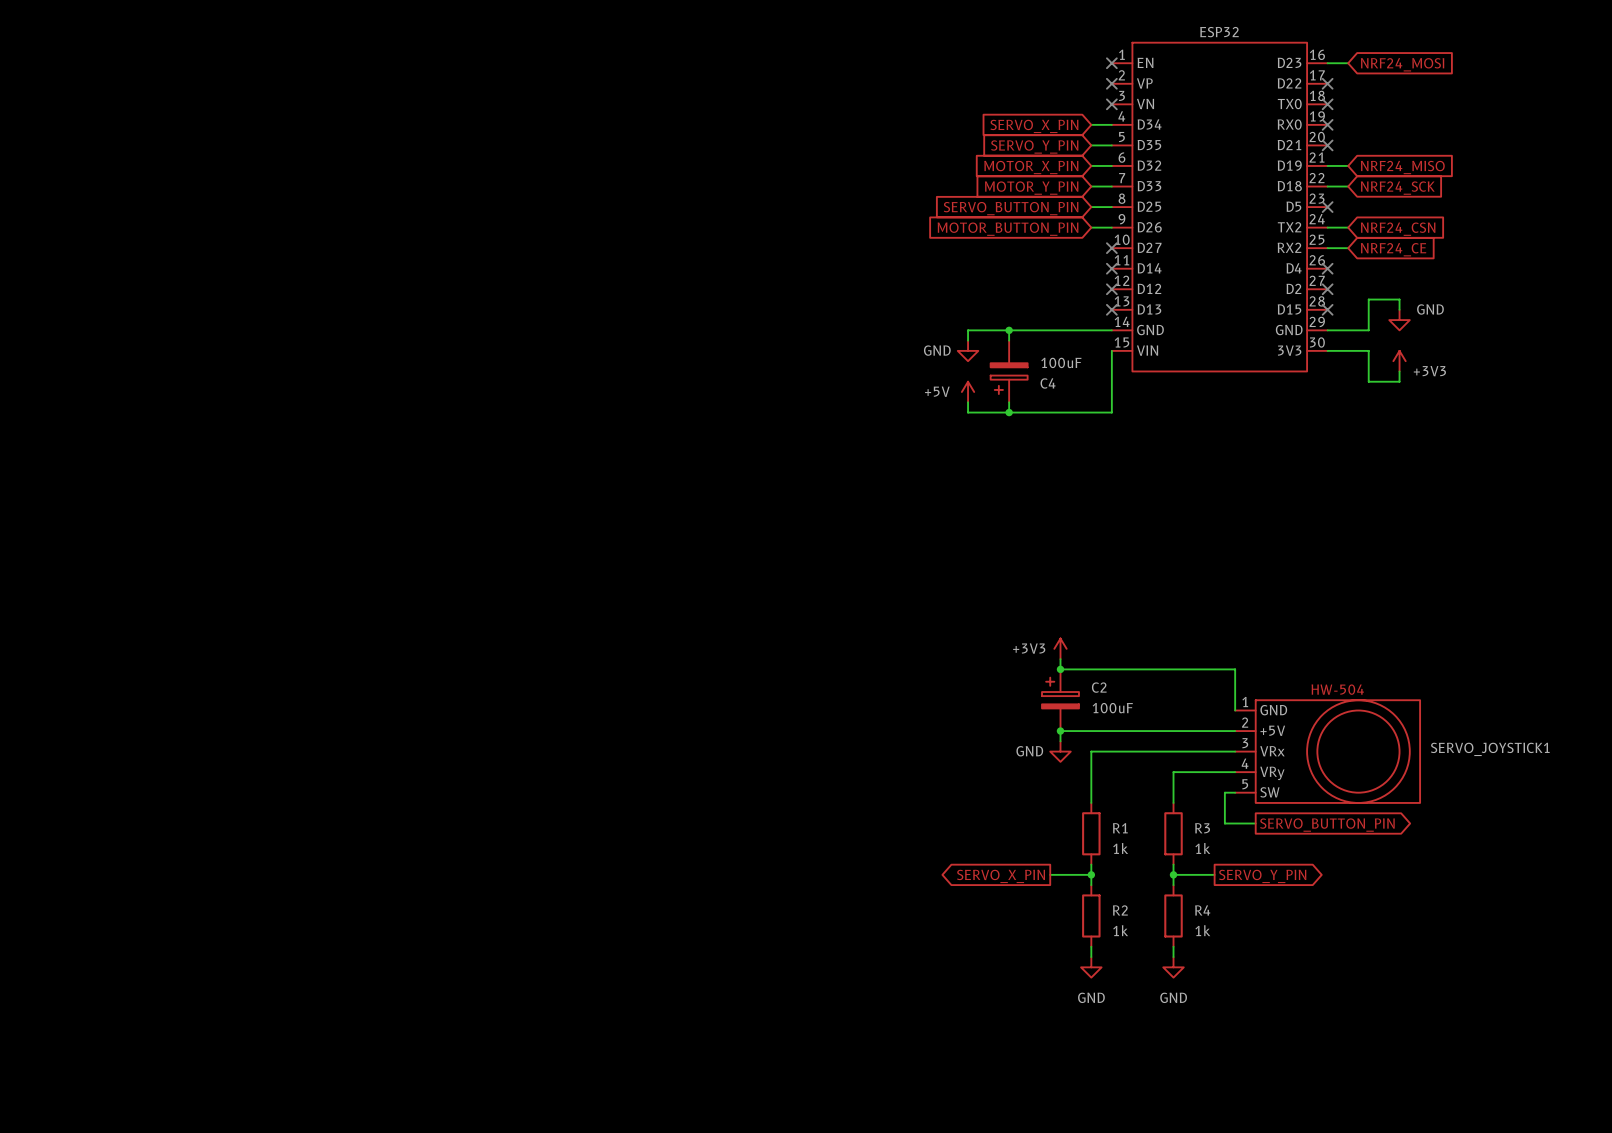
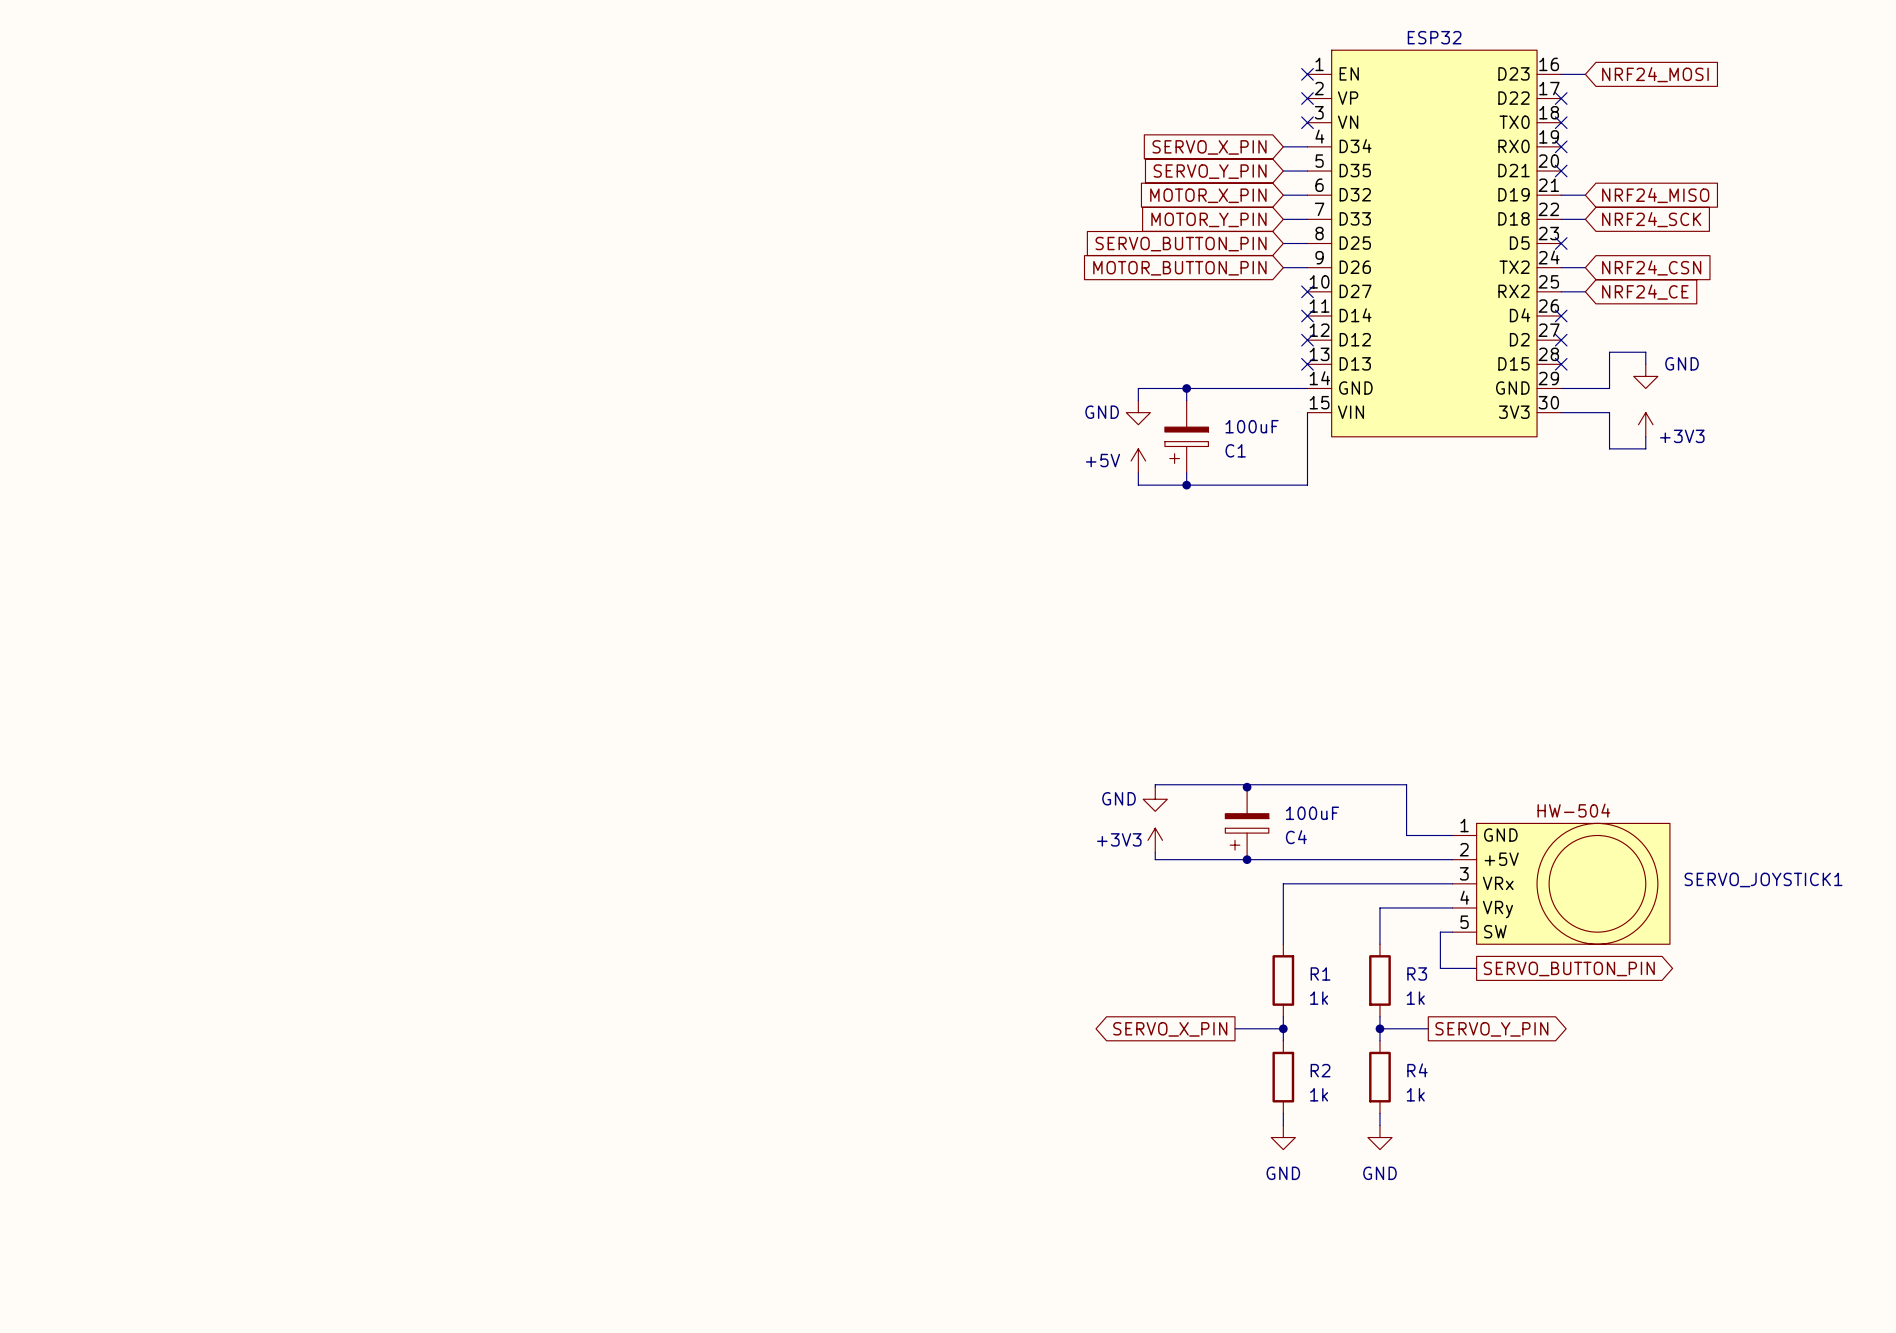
C4 name: C4 (1048, 383) -> C1 (1235, 450)
power symbol position: +3V3 (1060, 648) -> +3V3 (1155, 840)
wire: (1060, 659) (1060, 667) -> none
wire: (1060, 669) (1235, 669) (1235, 710) -> (1155, 787) (1155, 784) (1406, 784) (1406, 835) (1452, 835)
C2: 100uF (1060, 700) -> none
C4: none -> 100uF (1247, 823)
wire: (1060, 731) (1060, 741) -> (1247, 859) (1155, 859) (1155, 852)
power symbol position: GND (1060, 751) -> GND (1155, 799)

